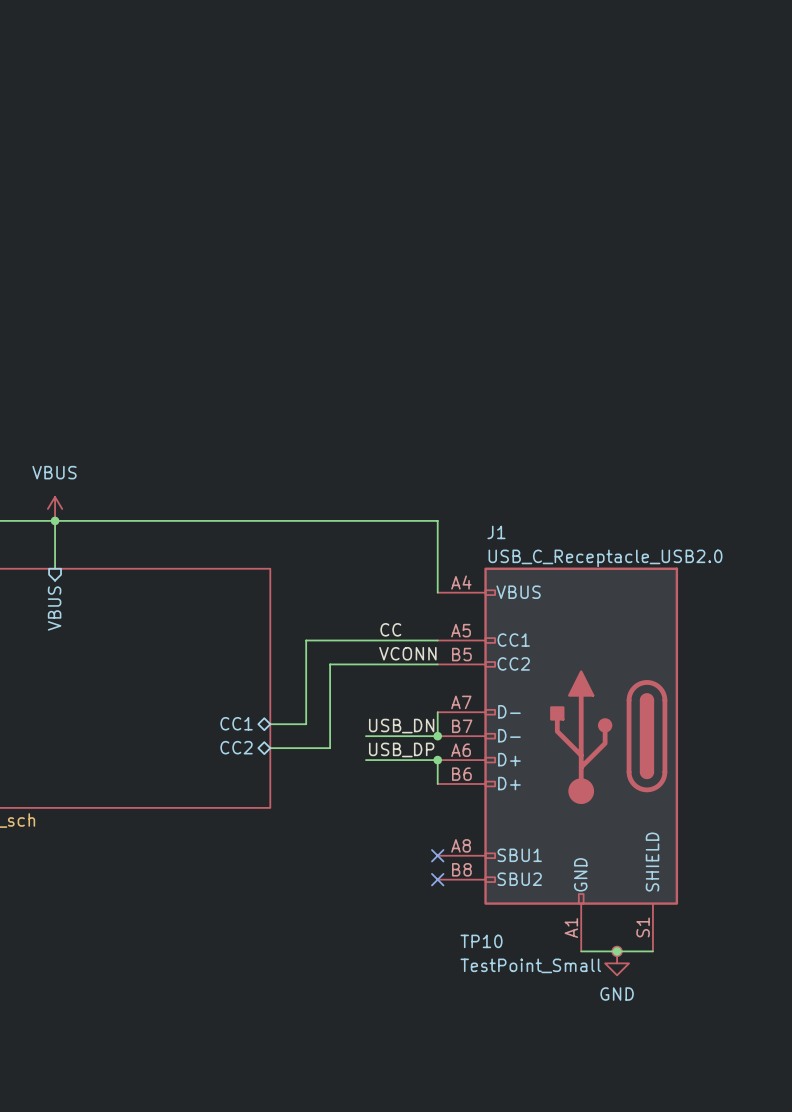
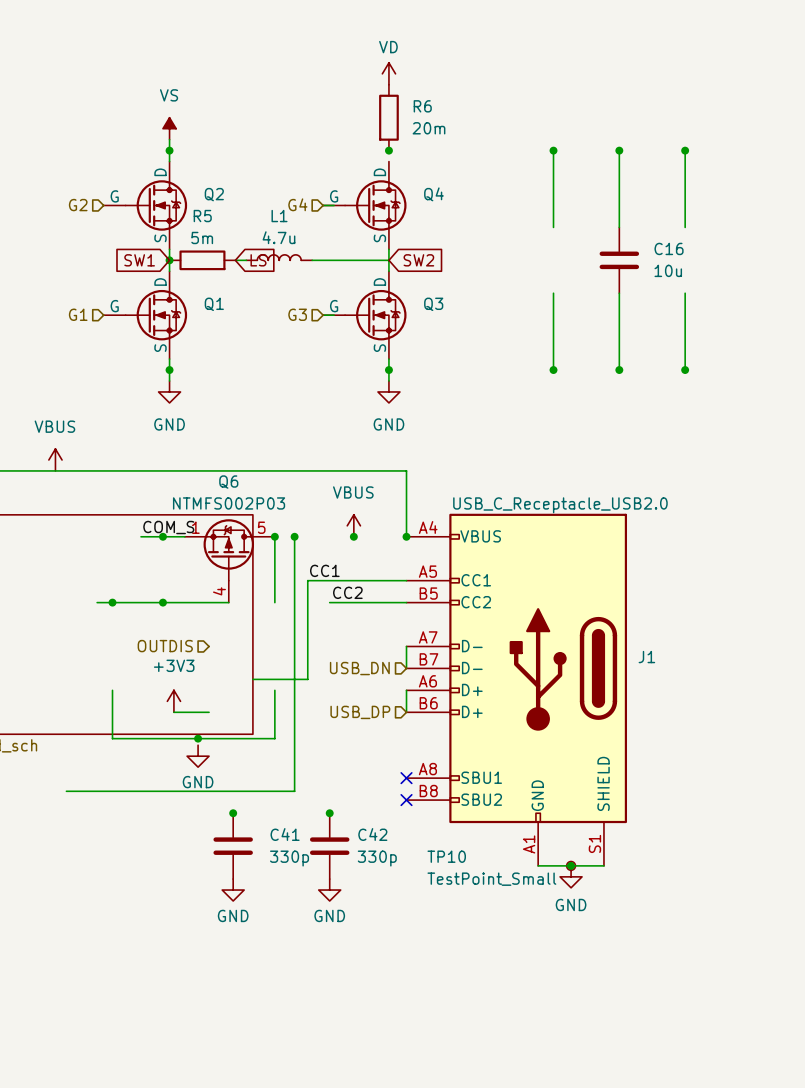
power symbol: none -> VD (388, 73)
R6: none -> 20m (388, 117)
power symbol: none -> VS (169, 128)
wire: none -> (169, 139) (169, 161)
junction: none -> (169, 150)
junction: none -> (388, 150)
wire: none -> (553, 150) (553, 227)
junction: none -> (553, 150)
wire: none -> (619, 150) (619, 227)
junction: none -> (619, 150)
wire: none -> (685, 150) (685, 227)
junction: none -> (685, 150)
hierarchical label: none -> G4 (297, 204)
hierarchical label: none -> G2 (78, 205)
Q2: none -> (145, 205)
wire: none -> (323, 205) (334, 205)
Q4: none -> (364, 205)
wire: none -> (169, 249) (169, 271)
wire: none -> (388, 249) (388, 271)
L1: none -> 4.7u (279, 257)
global label: none -> SW1 (139, 260)
junction: none -> (169, 260)
R5: none -> 5m (202, 260)
wire: none -> (235, 260) (246, 260)
global label: none -> LS (258, 260)
wire: none -> (312, 260) (388, 260)
global label: none -> SW2 (418, 260)
C16: none -> 10u (619, 260)
wire: none -> (553, 293) (553, 370)
wire: none -> (619, 293) (619, 370)
wire: none -> (685, 293) (685, 370)
hierarchical label: none -> G1 (78, 314)
hierarchical label: none -> G3 (297, 314)
Q1: none -> (145, 315)
wire: none -> (323, 315) (334, 315)
Q3: none -> (364, 315)
wire: none -> (169, 359) (169, 381)
wire: none -> (388, 359) (388, 381)
junction: none -> (169, 370)
junction: none -> (388, 370)
junction: none -> (553, 370)
junction: none -> (619, 370)
junction: none -> (685, 370)
power symbol: none -> GND (169, 391)
power symbol: none -> GND (388, 391)
wire: (55, 520) (55, 568) -> none
junction: (55, 520) -> none
J1 name position: J1 (496, 532) -> J1 (646, 657)
power symbol: none -> VBUS (353, 525)
label: none -> COM_S (168, 527)
wire: none -> (141, 536) (184, 536)
junction: none -> (162, 536)
wire: none -> (274, 536) (274, 602)
junction: none -> (274, 536)
wire: none -> (294, 536) (294, 791) (66, 791)
junction: none -> (294, 536)
junction: none -> (353, 536)
junction: none -> (406, 536)
sheet pin: VBUS (54, 608) -> none
Q6: none -> NTMFS002P03 (228, 560)
label: none -> CC1 (324, 570)
label: CC (390, 629) -> CC2 (347, 592)
wire: (330, 640) (306, 640) (306, 724) (270, 724) -> none
label: VCONN (407, 653) -> none
wire: none -> (97, 602) (228, 602)
junction: none -> (112, 602)
junction: none -> (162, 602)
wire: (330, 664) (354, 664) -> (307, 602) (307, 580)
hierarchical label: none -> OUTDIS (165, 646)
sheet pin: CC1 (236, 723) -> none
label: USB_DN (401, 726) -> none
wire: (365, 736) (437, 736) -> none
hierarchical label: none -> USB_DN (359, 668)
junction: (437, 736) -> none
sheet pin: CC2 (236, 747) -> none
label: USB_DP (401, 749) -> none
wire: none -> (112, 690) (112, 738) (274, 738) (274, 690)
wire: (365, 760) (437, 760) -> none
junction: (437, 760) -> none
power symbol: none -> +3V3 (173, 701)
wire: none -> (173, 712) (209, 712)
hierarchical label: none -> USB_DP (360, 712)
junction: none -> (198, 738)
power symbol: none -> GND (198, 756)
junction: none -> (233, 813)
junction: none -> (329, 813)
C41: none -> 330p (233, 846)
C42: none -> 330p (329, 846)
power symbol: none -> GND (233, 890)
power symbol: none -> GND (329, 890)

